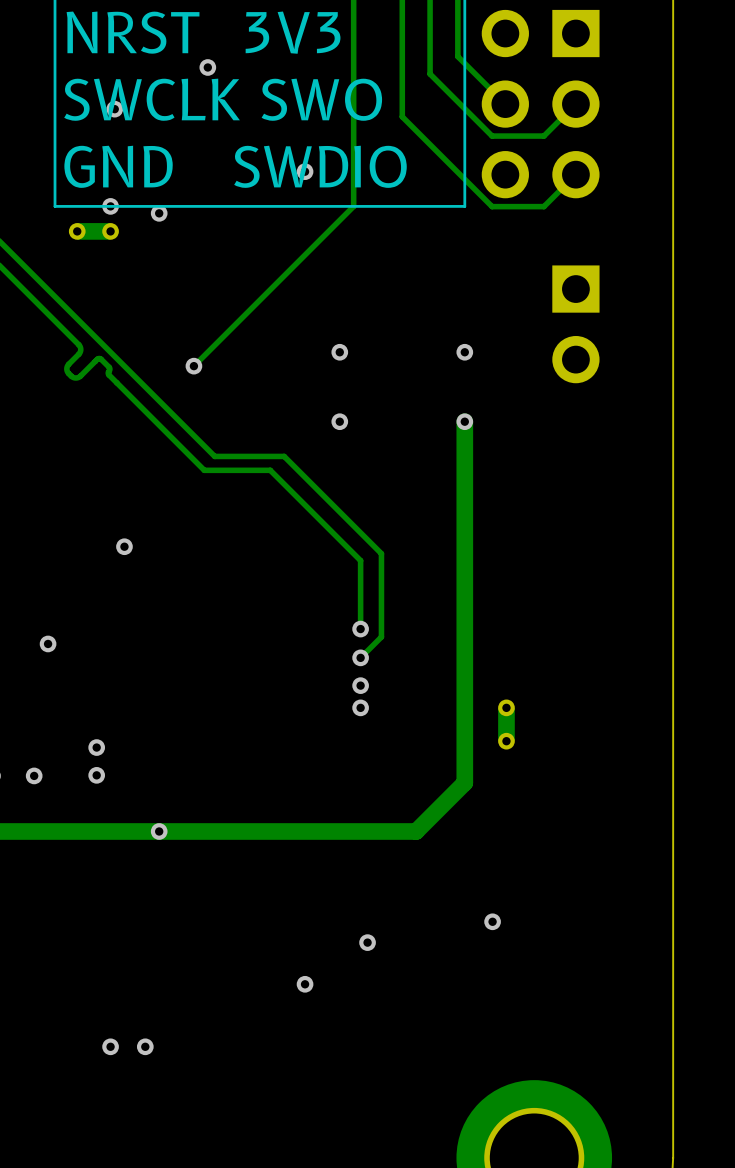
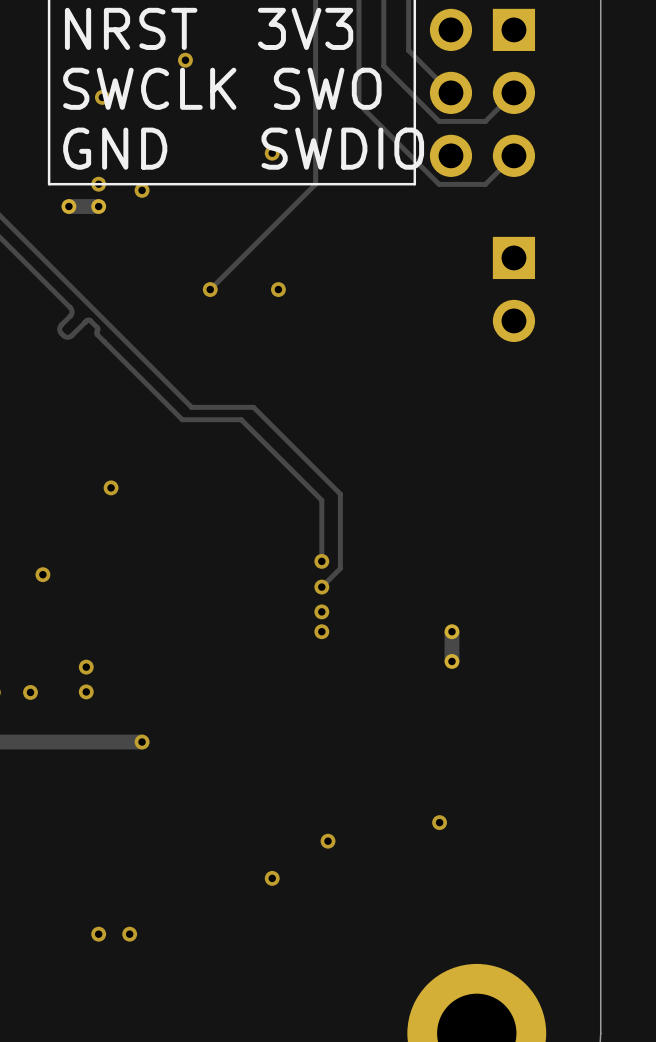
track: (235, 324) (193, 366) -> none
via: none -> (210, 289)
via position: (339, 352) -> (278, 289)
via: (464, 352) -> none
via: (193, 366) -> none
via: (339, 421) -> none
track: (464, 421) (464, 782) (416, 831) (159, 831) -> none
via: (464, 421) -> none

